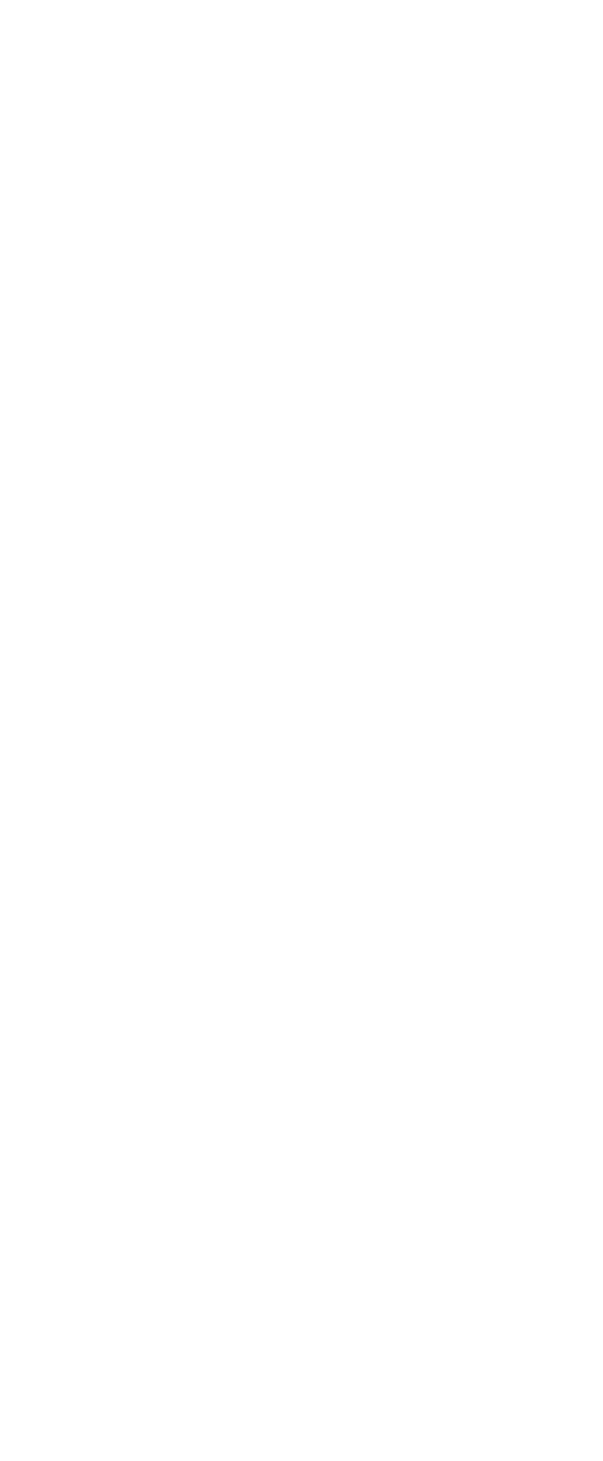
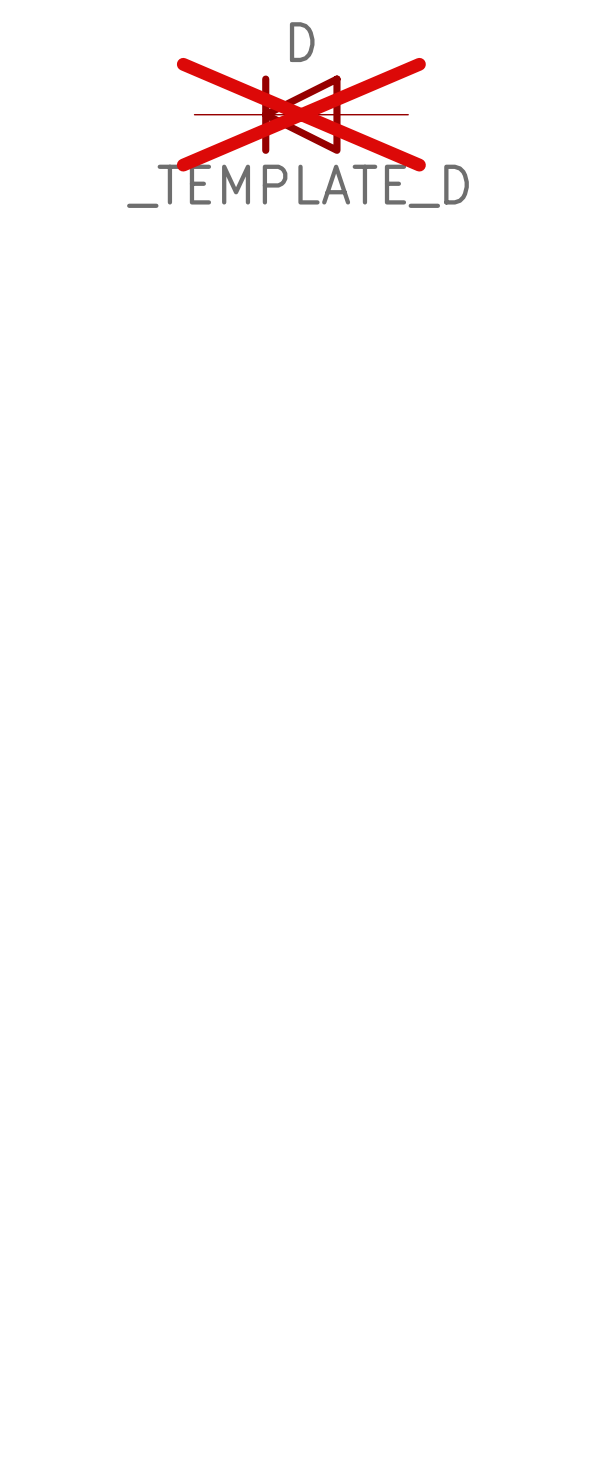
_TEMPLATE_D: none -> D (301, 114)

